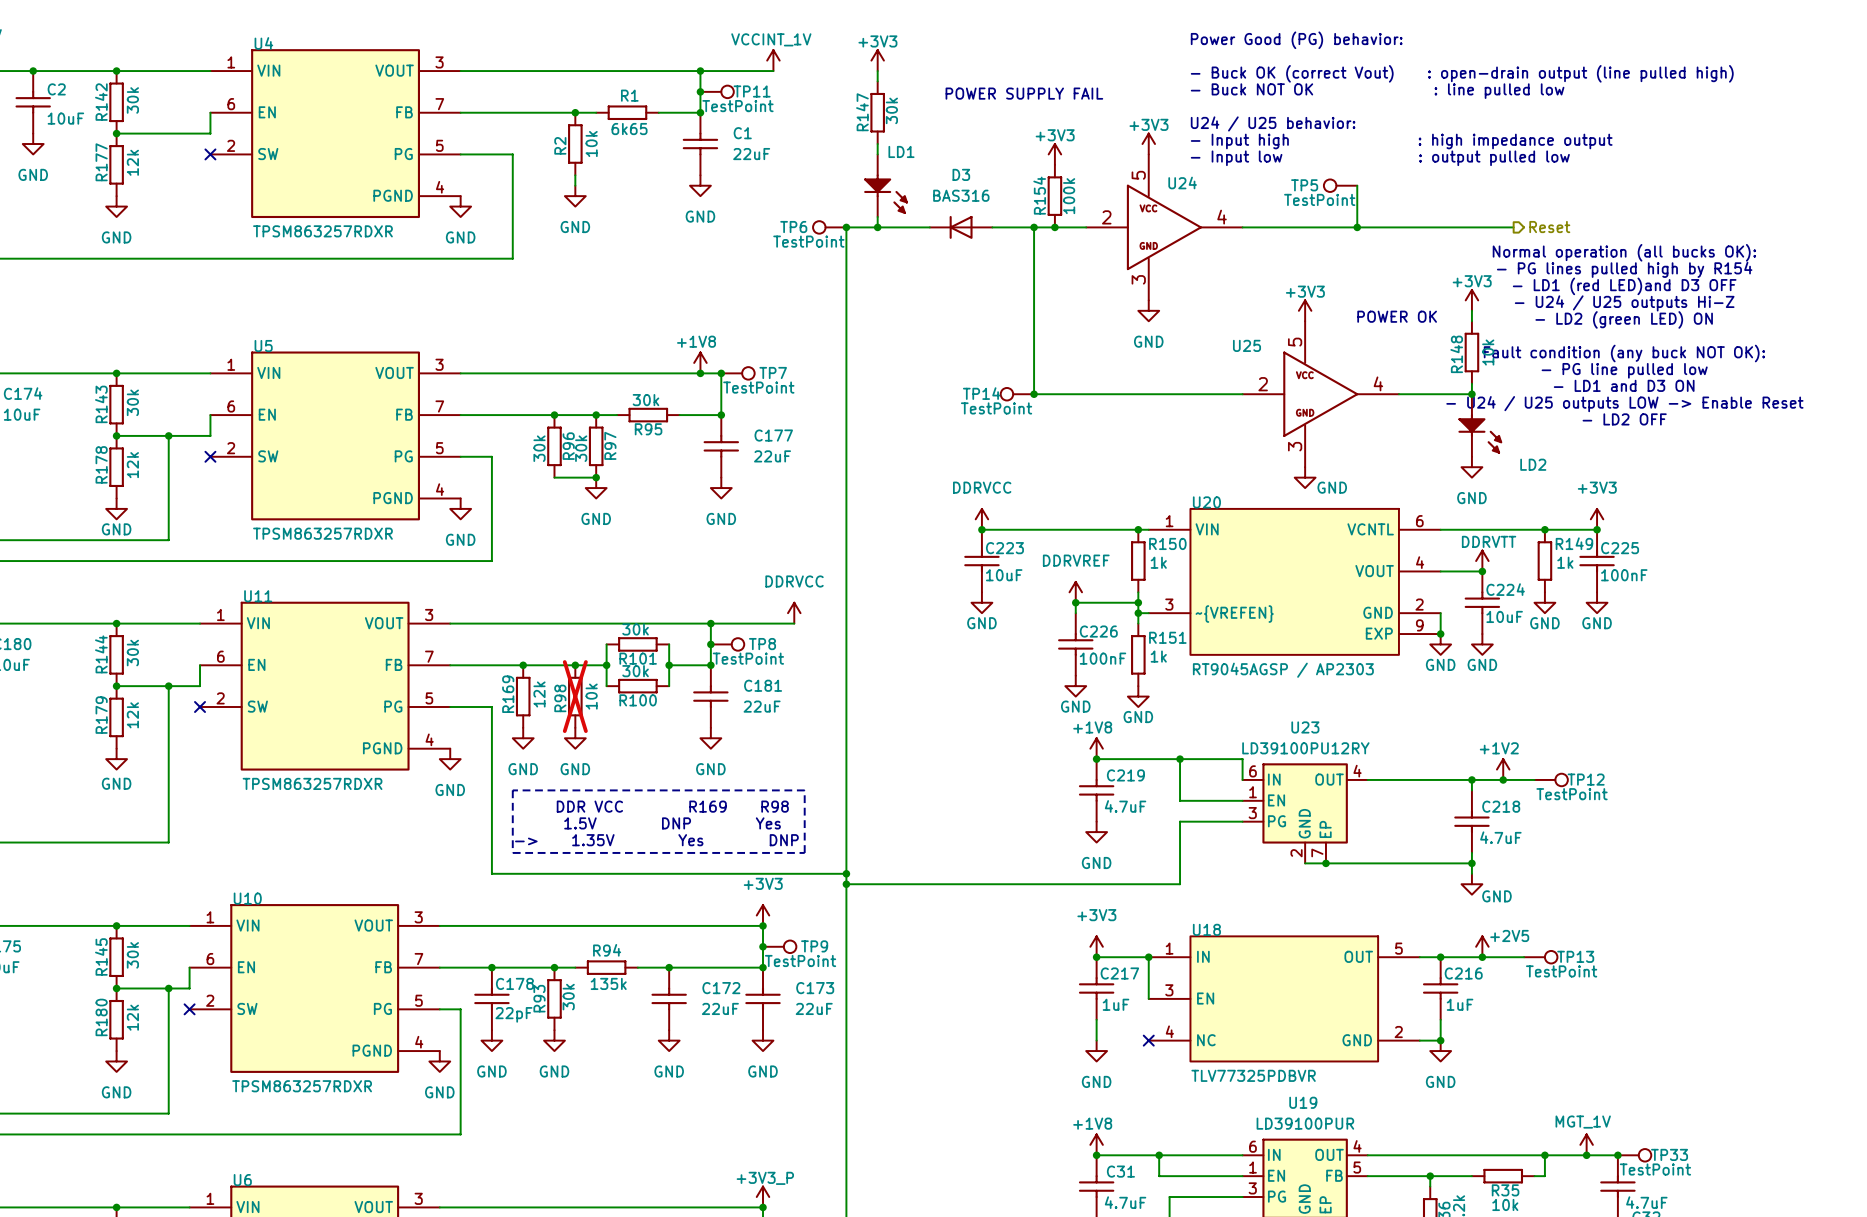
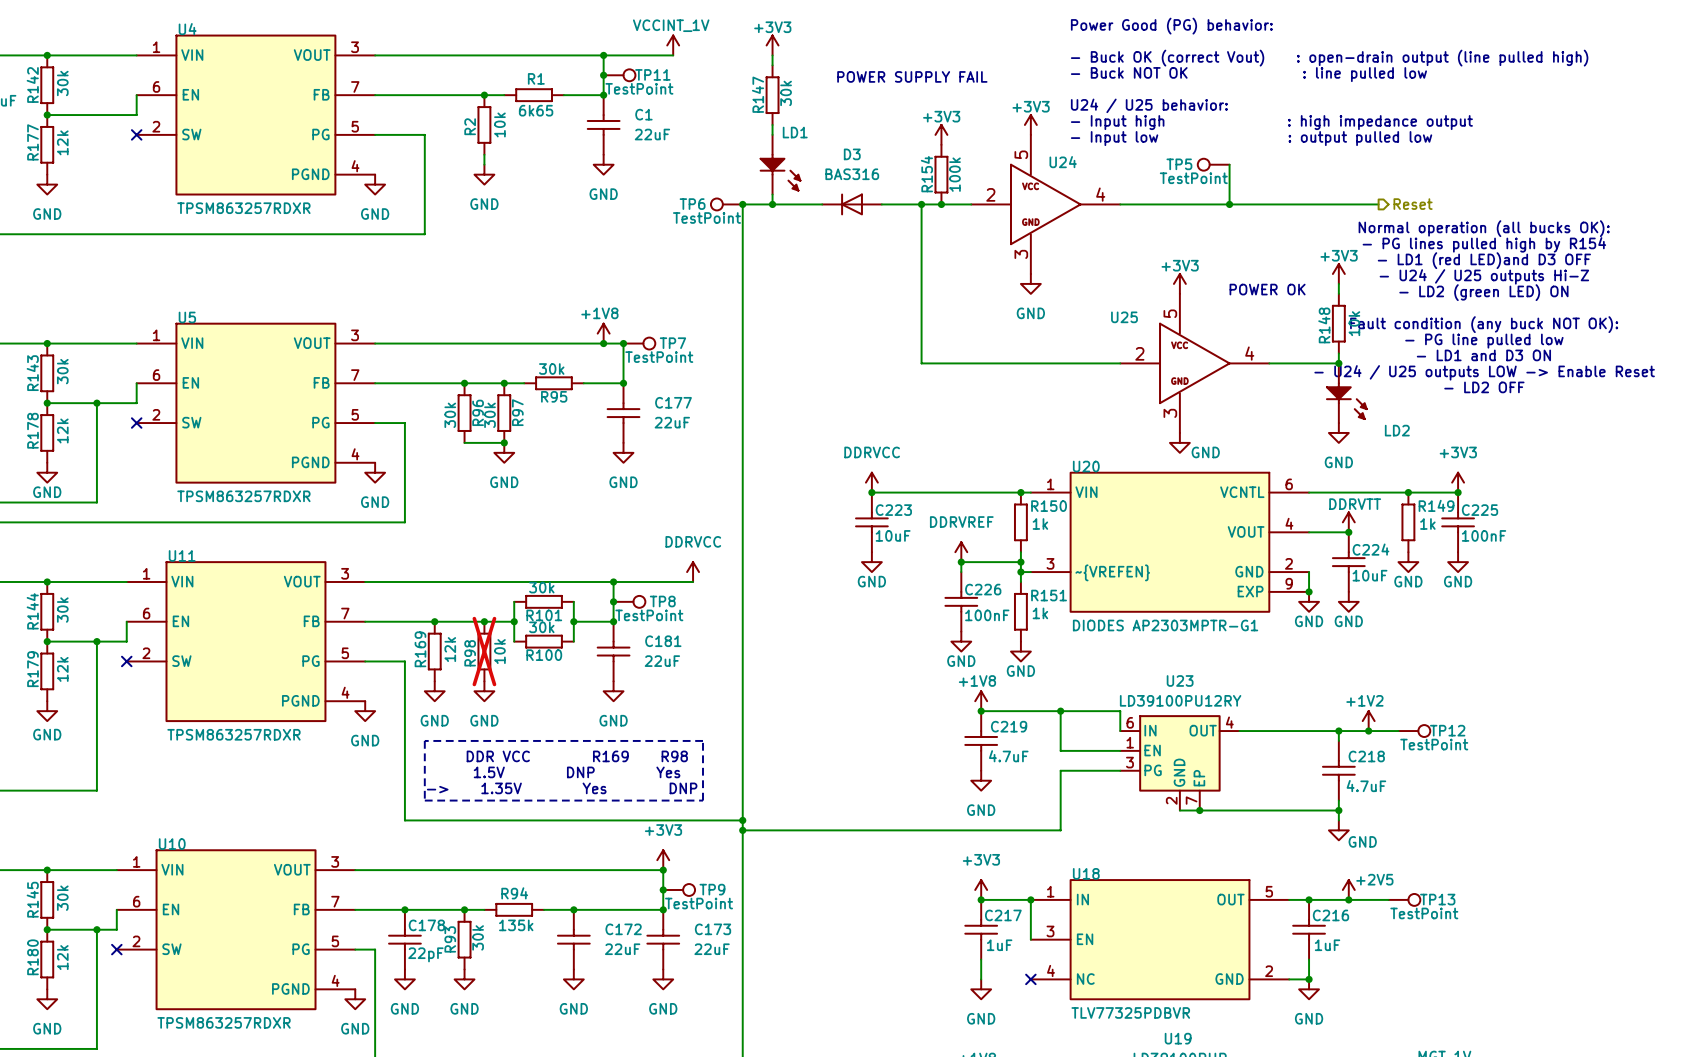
TP14: TestPoint (1017, 394) -> none
junction: (1034, 394) -> none
U20 value: RT9045AGSP / AP2303 (1283, 670) -> DIODES AP2303MPTR-G1 (1165, 625)

